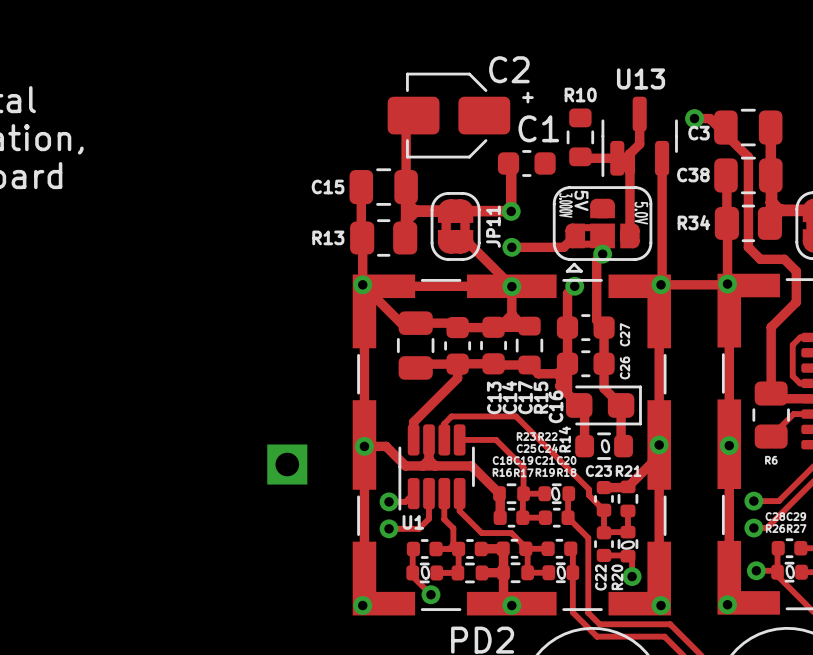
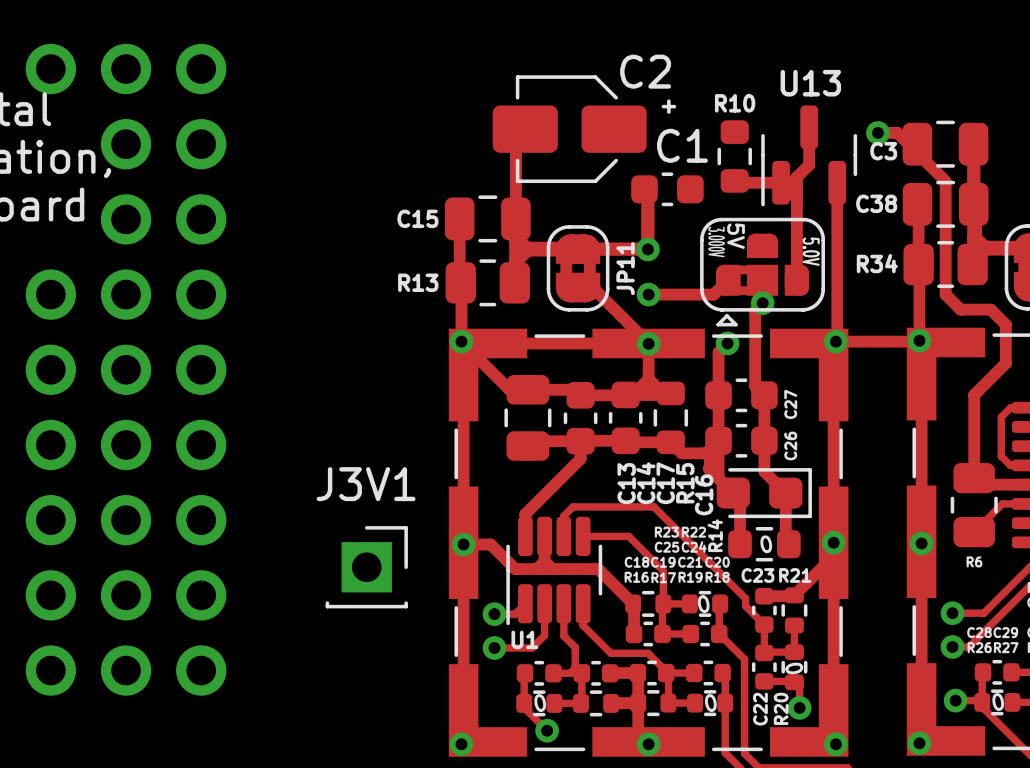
part: none -> (50, 69)
part: none -> (126, 69)
part: none -> (201, 69)
part: none -> (126, 144)
part: none -> (201, 144)
part: none -> (126, 219)
part: none -> (201, 219)
part: none -> (50, 294)
part: none -> (126, 294)
part: none -> (201, 294)
part: none -> (50, 369)
part: none -> (126, 369)
part: none -> (201, 369)
part: none -> (50, 444)
part: none -> (126, 444)
part: none -> (201, 444)
part: none -> (50, 520)
part: none -> (126, 520)
part: none -> (201, 520)
J3V1 side: bottom (287, 464) -> top (366, 567)
part: none -> (50, 595)
part: none -> (126, 595)
part: none -> (201, 595)
part: none -> (50, 670)
part: none -> (126, 670)
part: none -> (201, 670)

